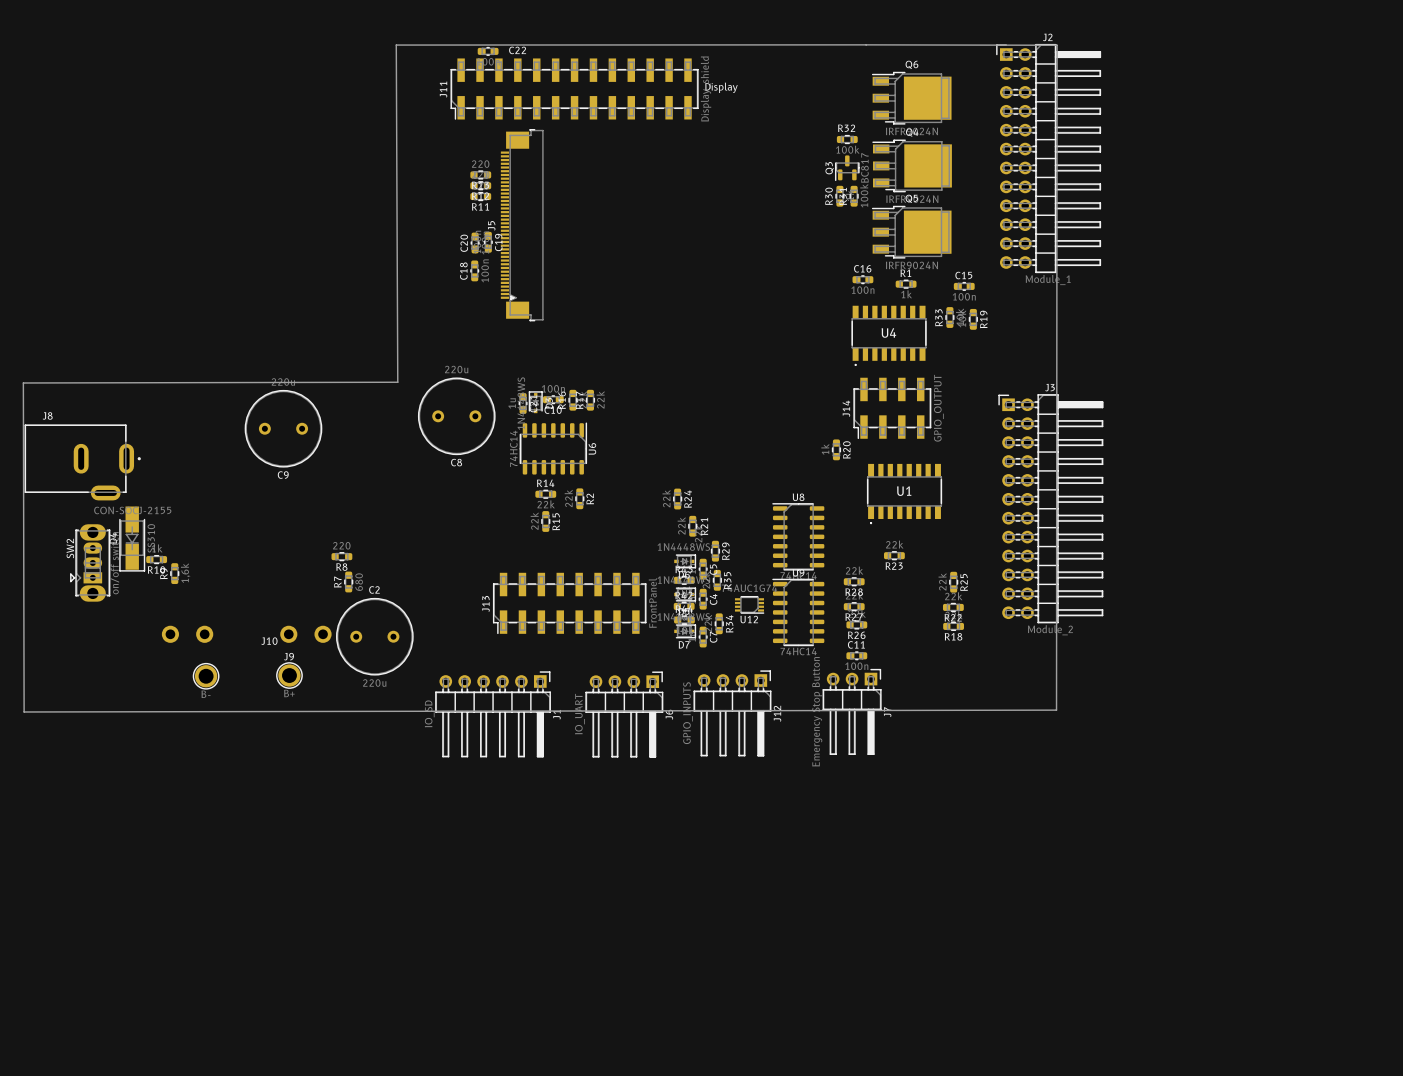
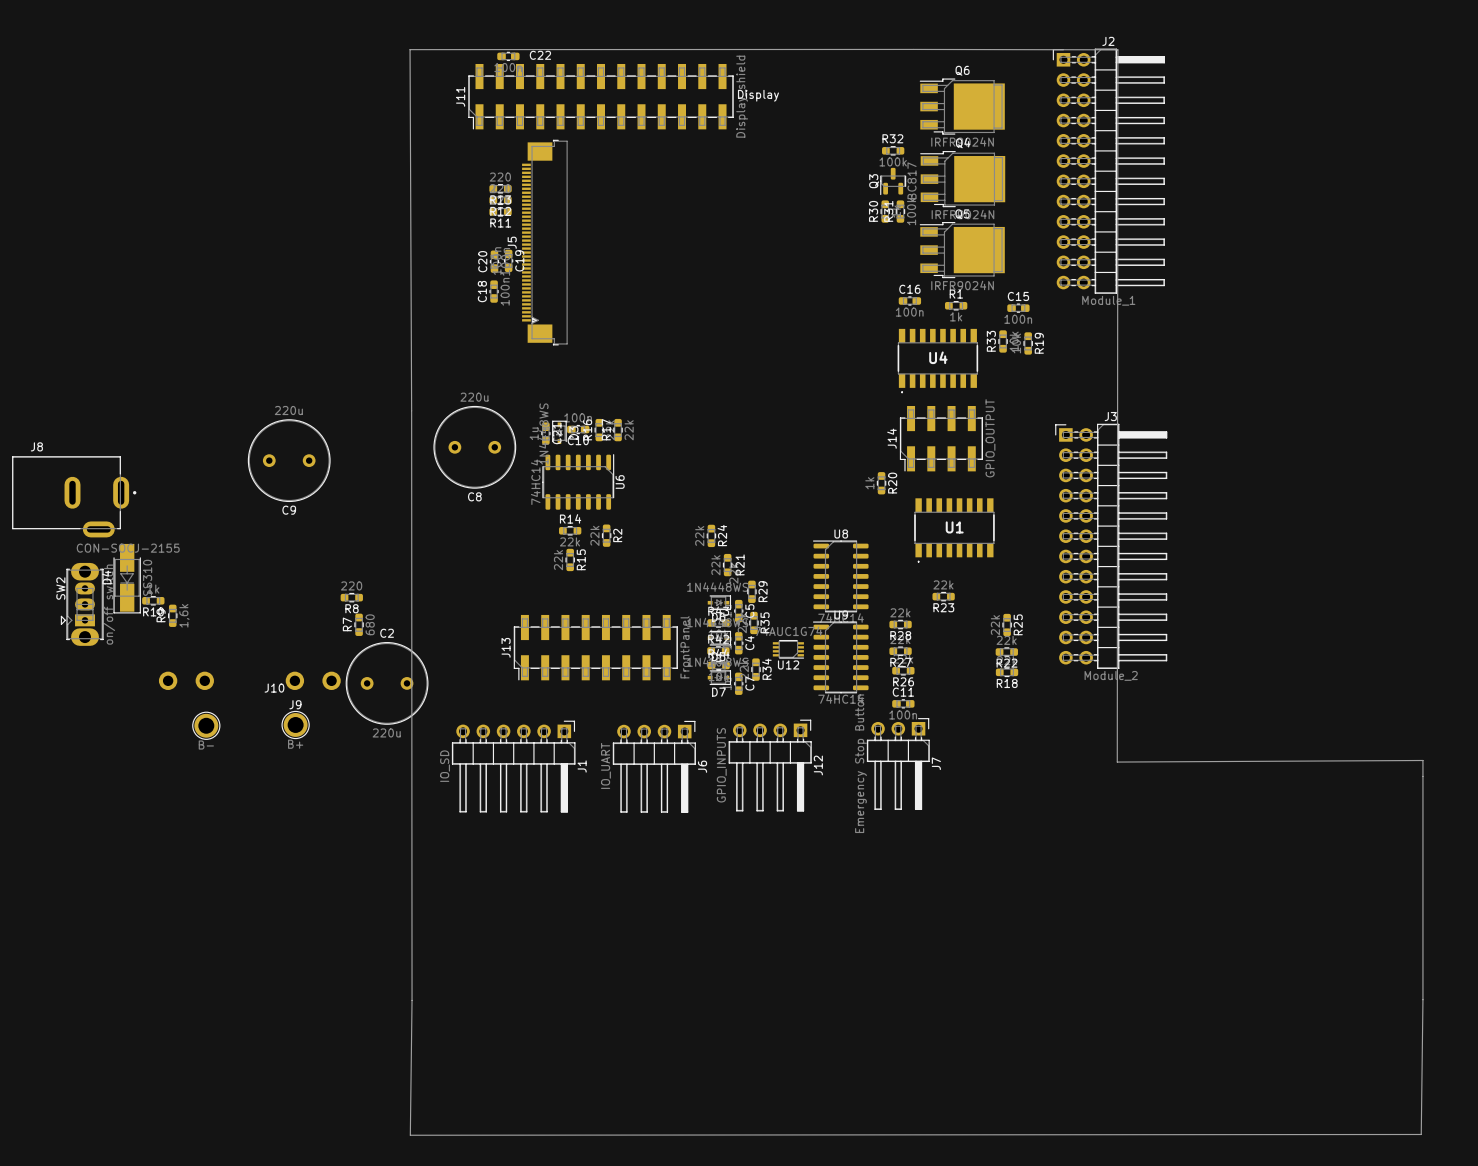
board edge: (397, 382) (23, 382) (24, 711) (1056, 710) -> (411, 410) (410, 1135) (1421, 1134) (1422, 760) (1117, 762)

